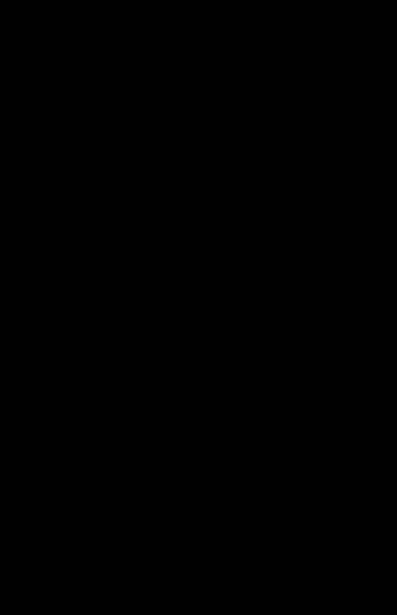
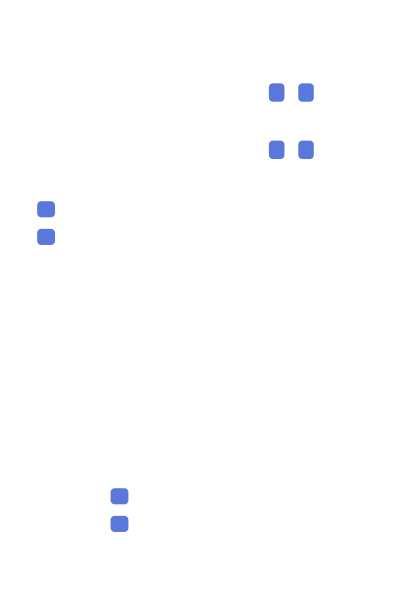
part: none -> (291, 92)
part: none -> (291, 149)
part: none -> (46, 223)
part: none -> (119, 510)

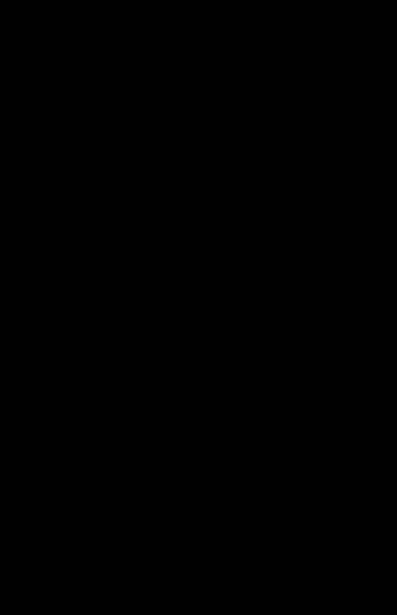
part: (291, 92) -> none
part: (291, 149) -> none
part: (46, 223) -> none
part: (119, 510) -> none

